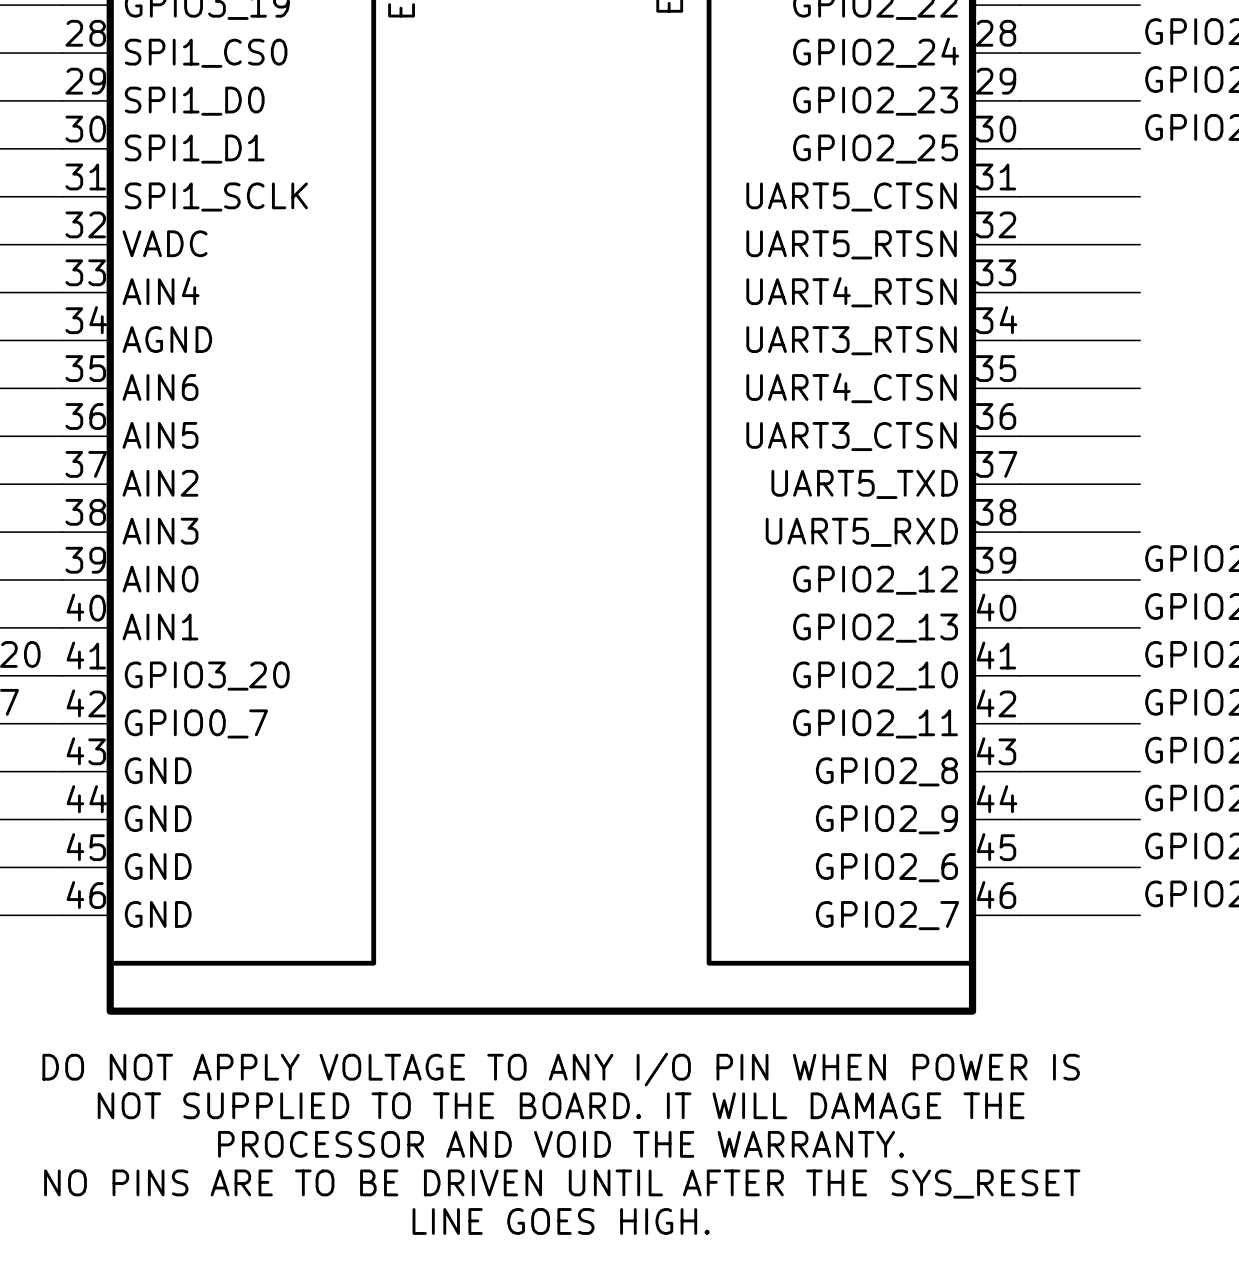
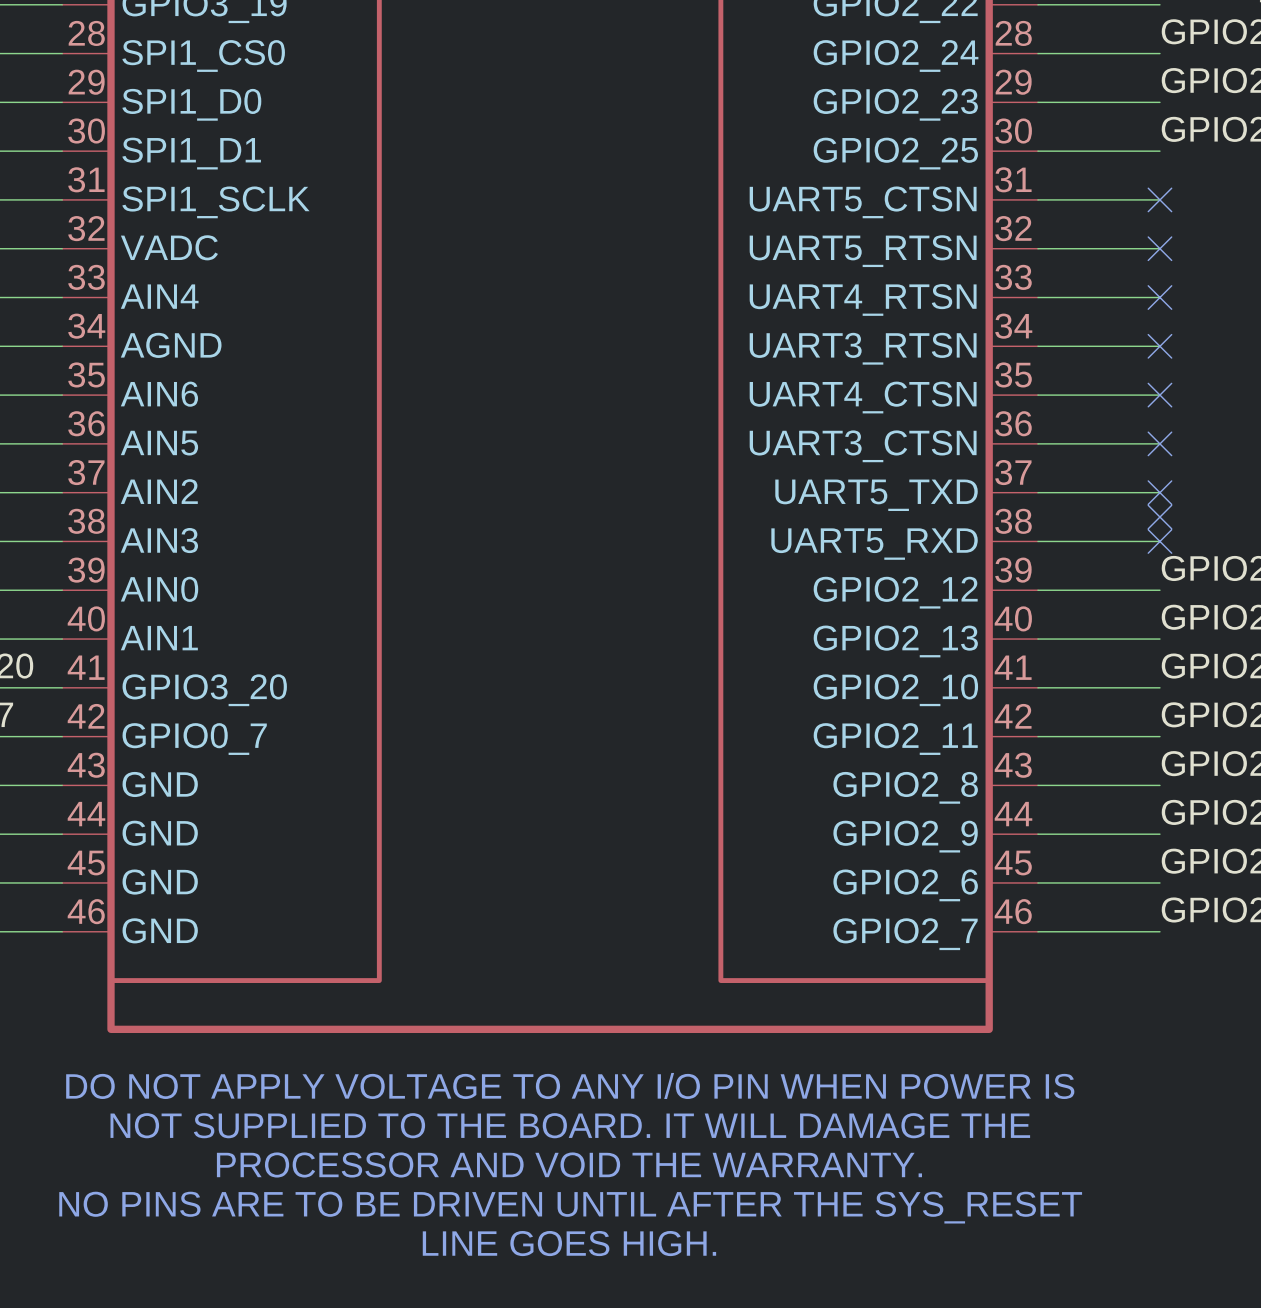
no-connect mark: none -> (1159, 199)
no-connect mark: none -> (1159, 248)
no-connect mark: none -> (1159, 297)
no-connect mark: none -> (1159, 346)
no-connect mark: none -> (1159, 395)
no-connect mark: none -> (1159, 443)
no-connect mark: none -> (1159, 492)
no-connect mark: none -> (1159, 517)
no-connect mark: none -> (1159, 541)

